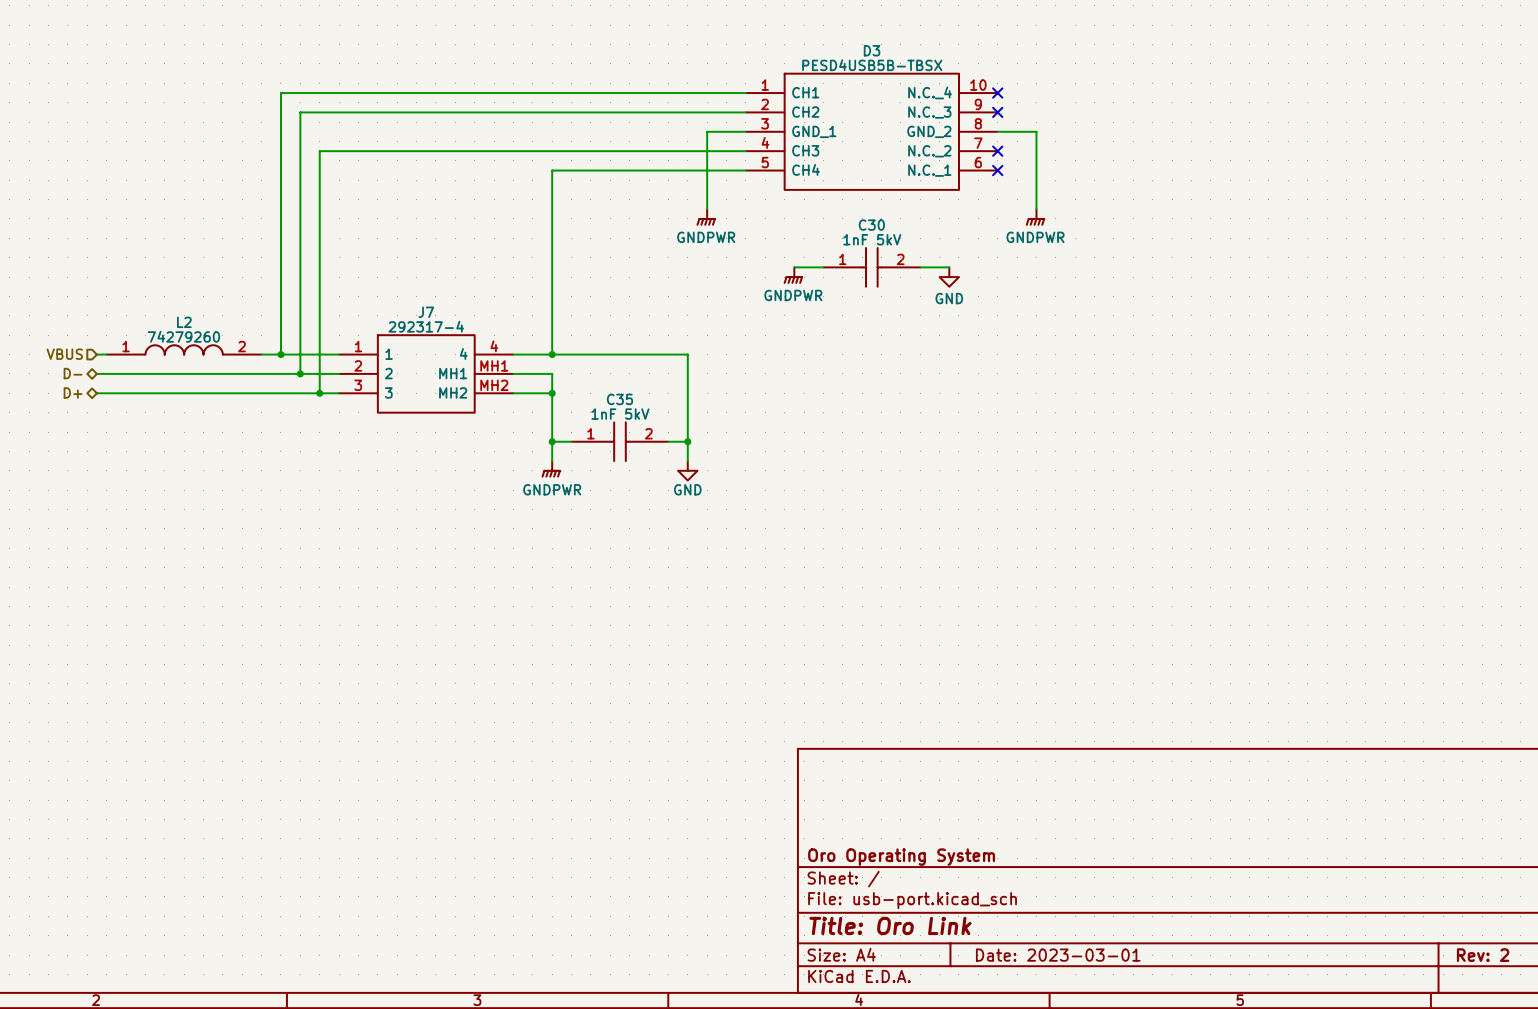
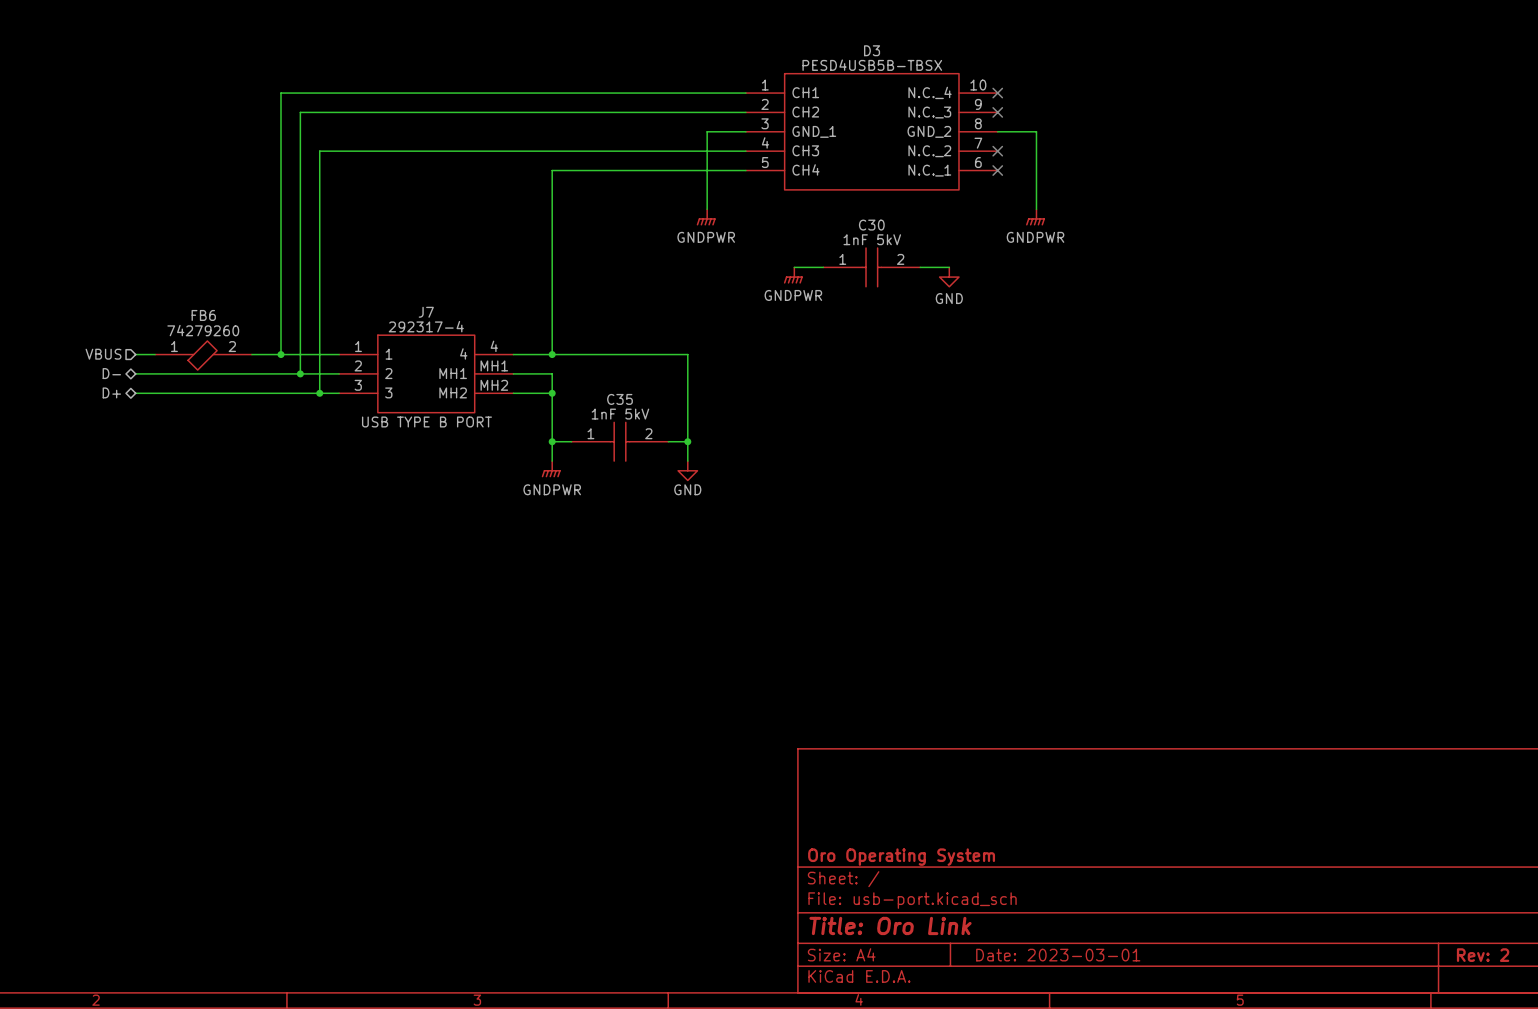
L2: 74279260 (184, 349) -> none
hierarchical label position: VBUS (64, 354) -> VBUS (103, 354)
FB6: none -> 74279260 (203, 355)
hierarchical label position: D- (73, 373) -> D- (111, 373)
wire: (96, 373) (135, 373) -> none
hierarchical label position: D+ (73, 392) -> D+ (111, 392)
wire: (96, 393) (135, 393) -> none
J7 text: none -> USB TYPE B PORT (426, 421)

